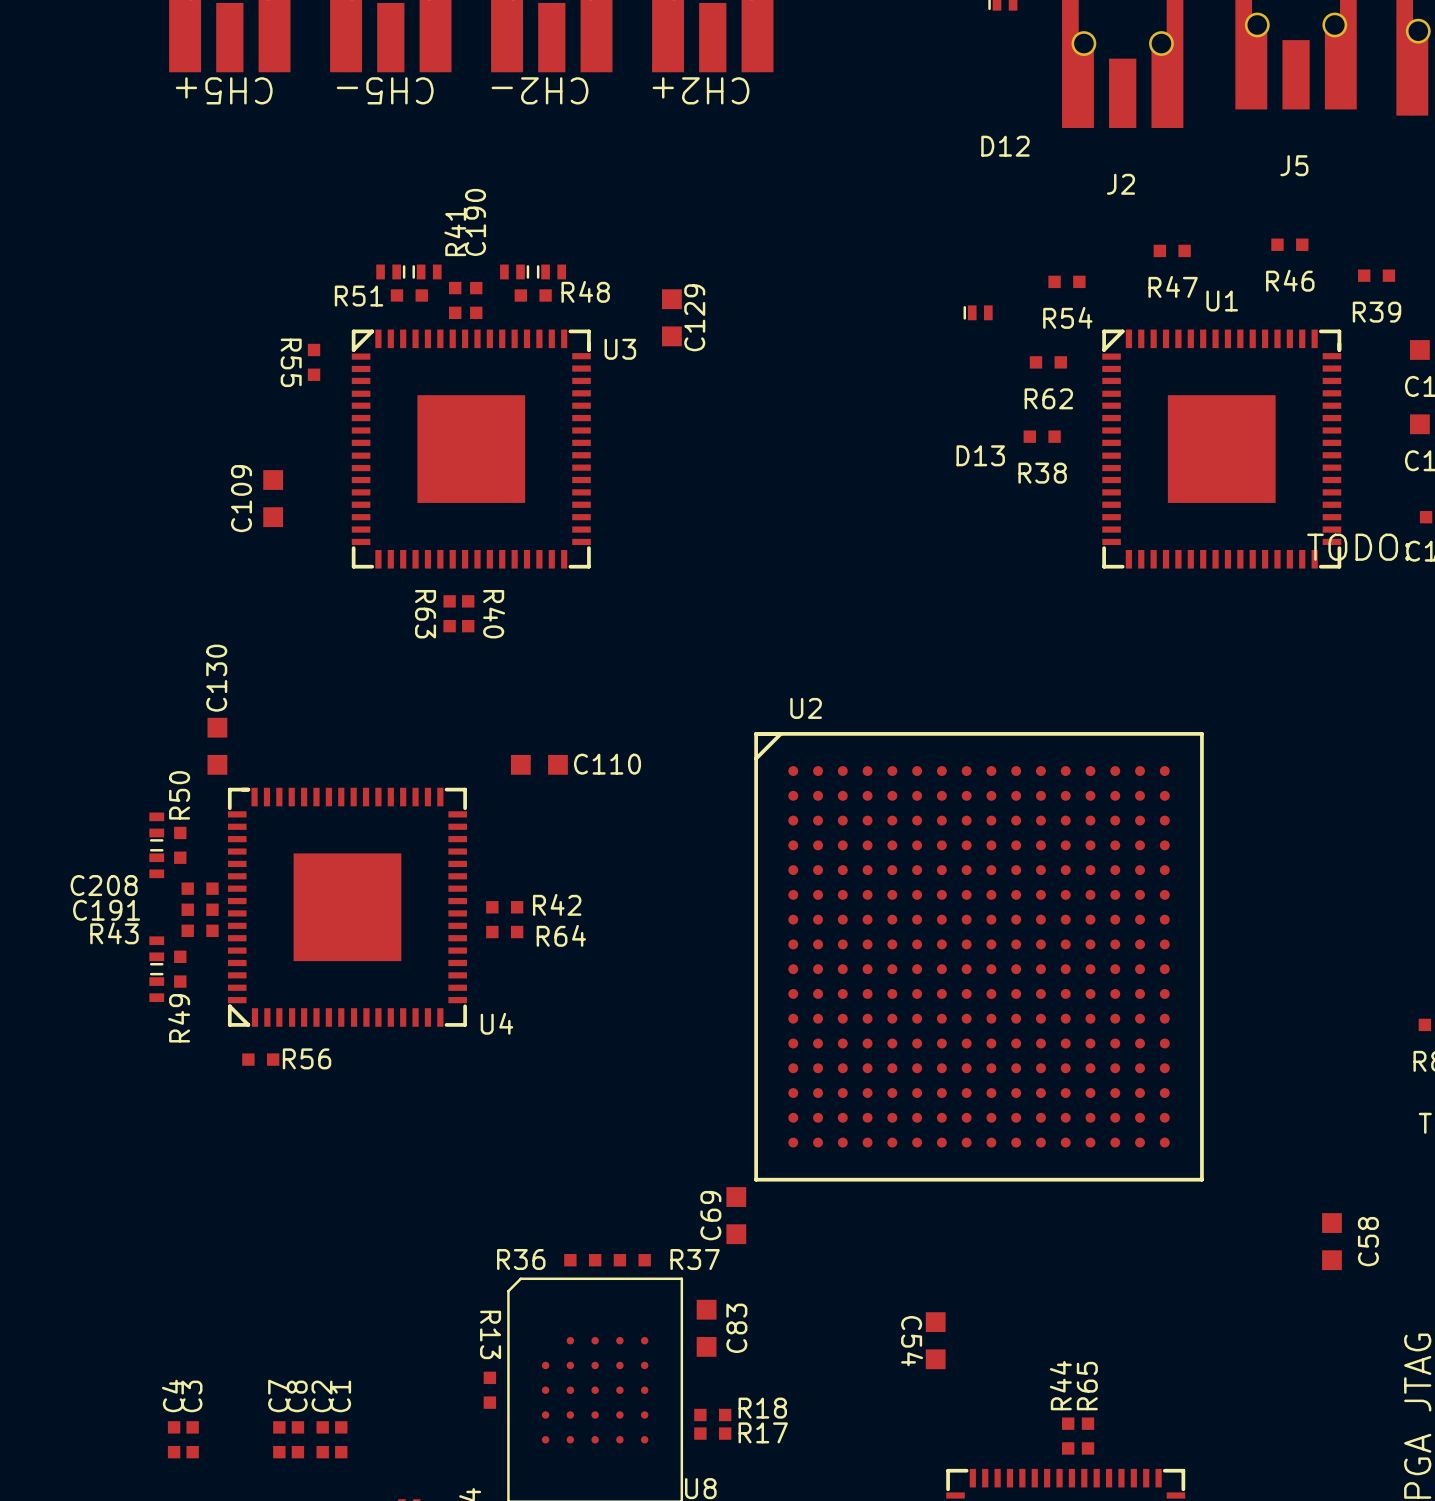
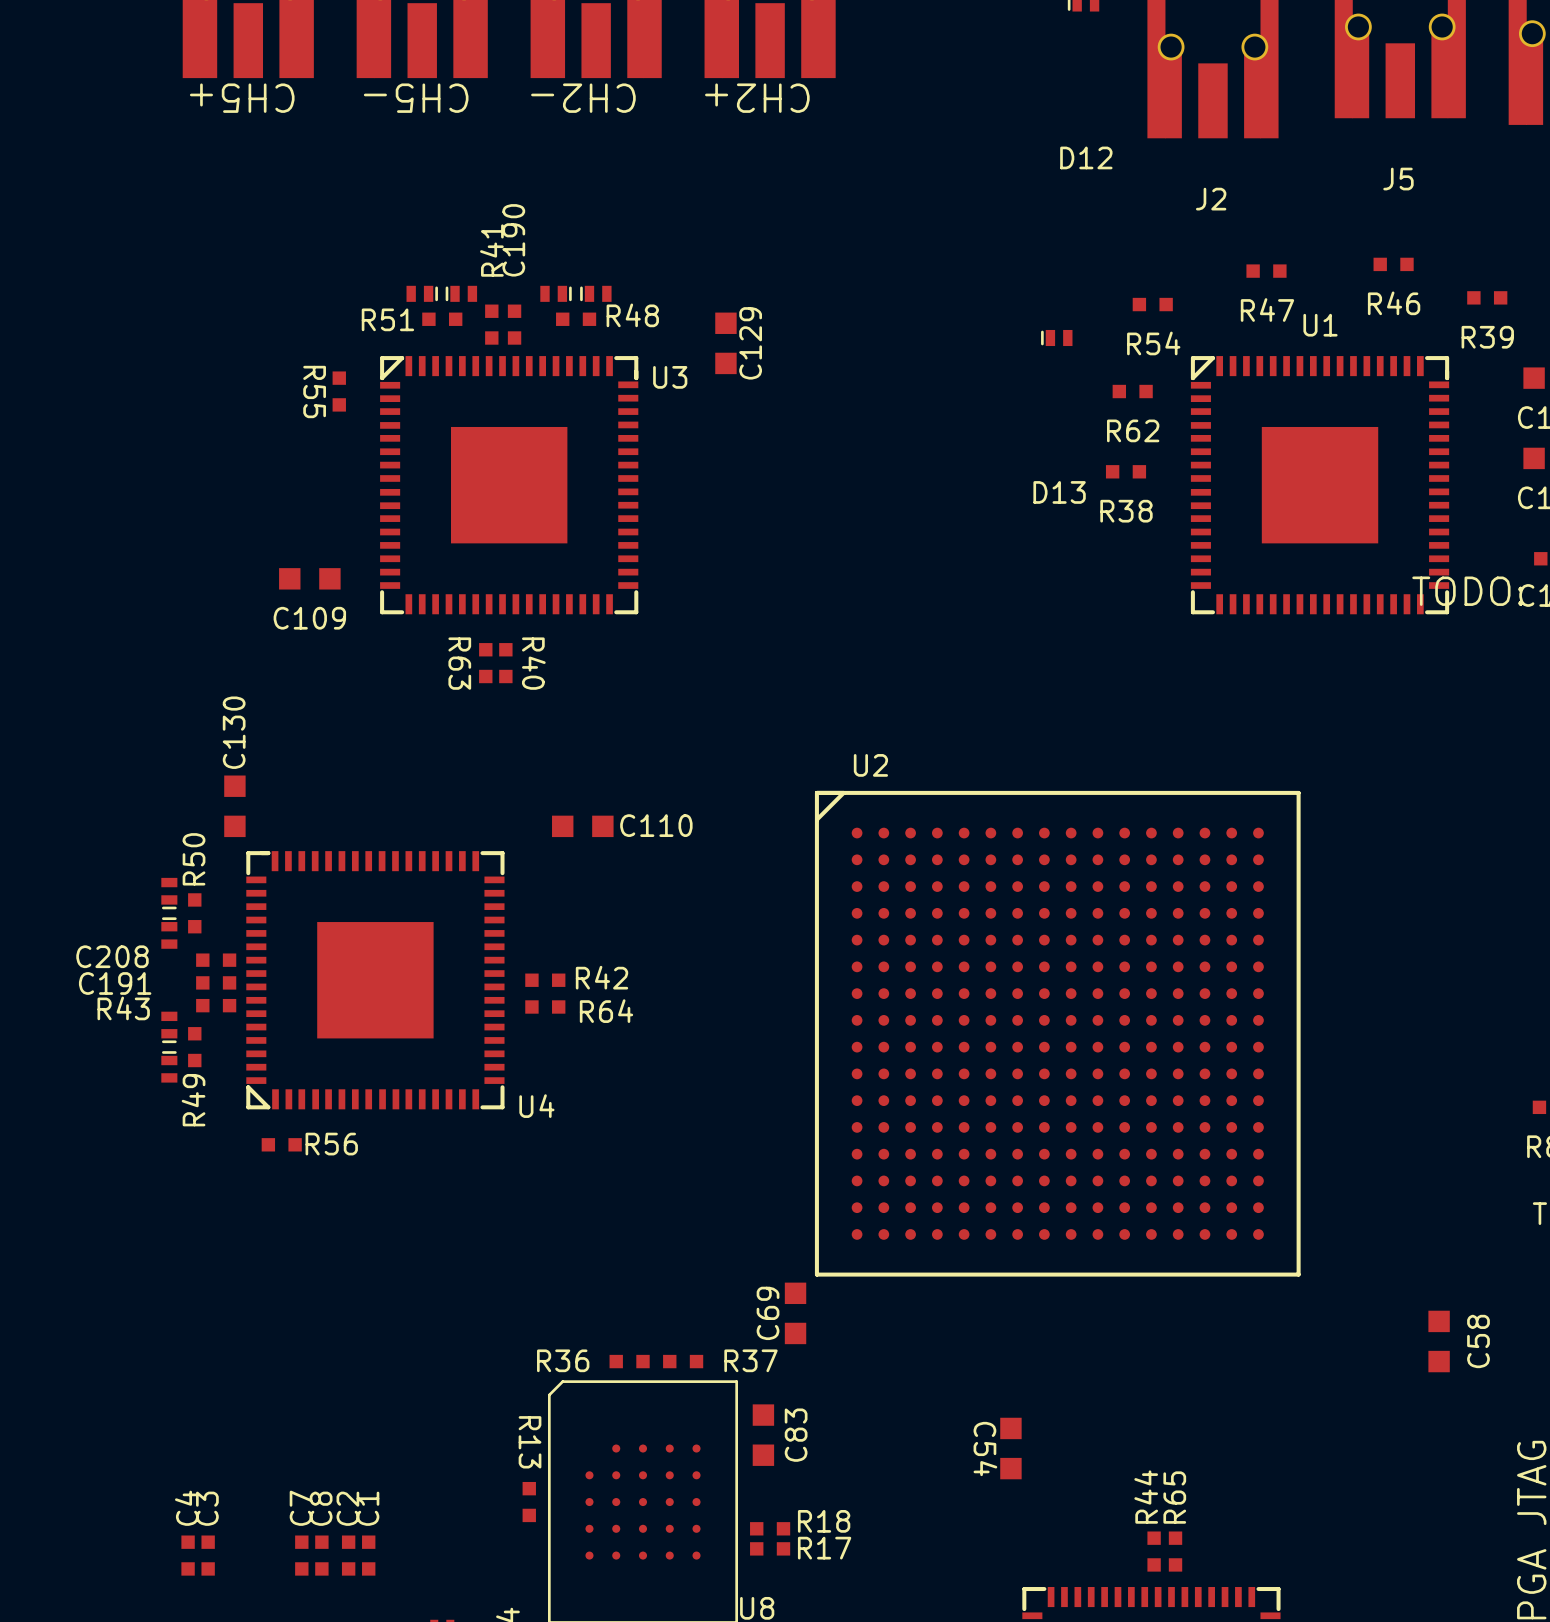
C109 rotation: 0° (273, 498) -> 90° clockwise (309, 578)
C109 position: (273, 498) -> (309, 578)

